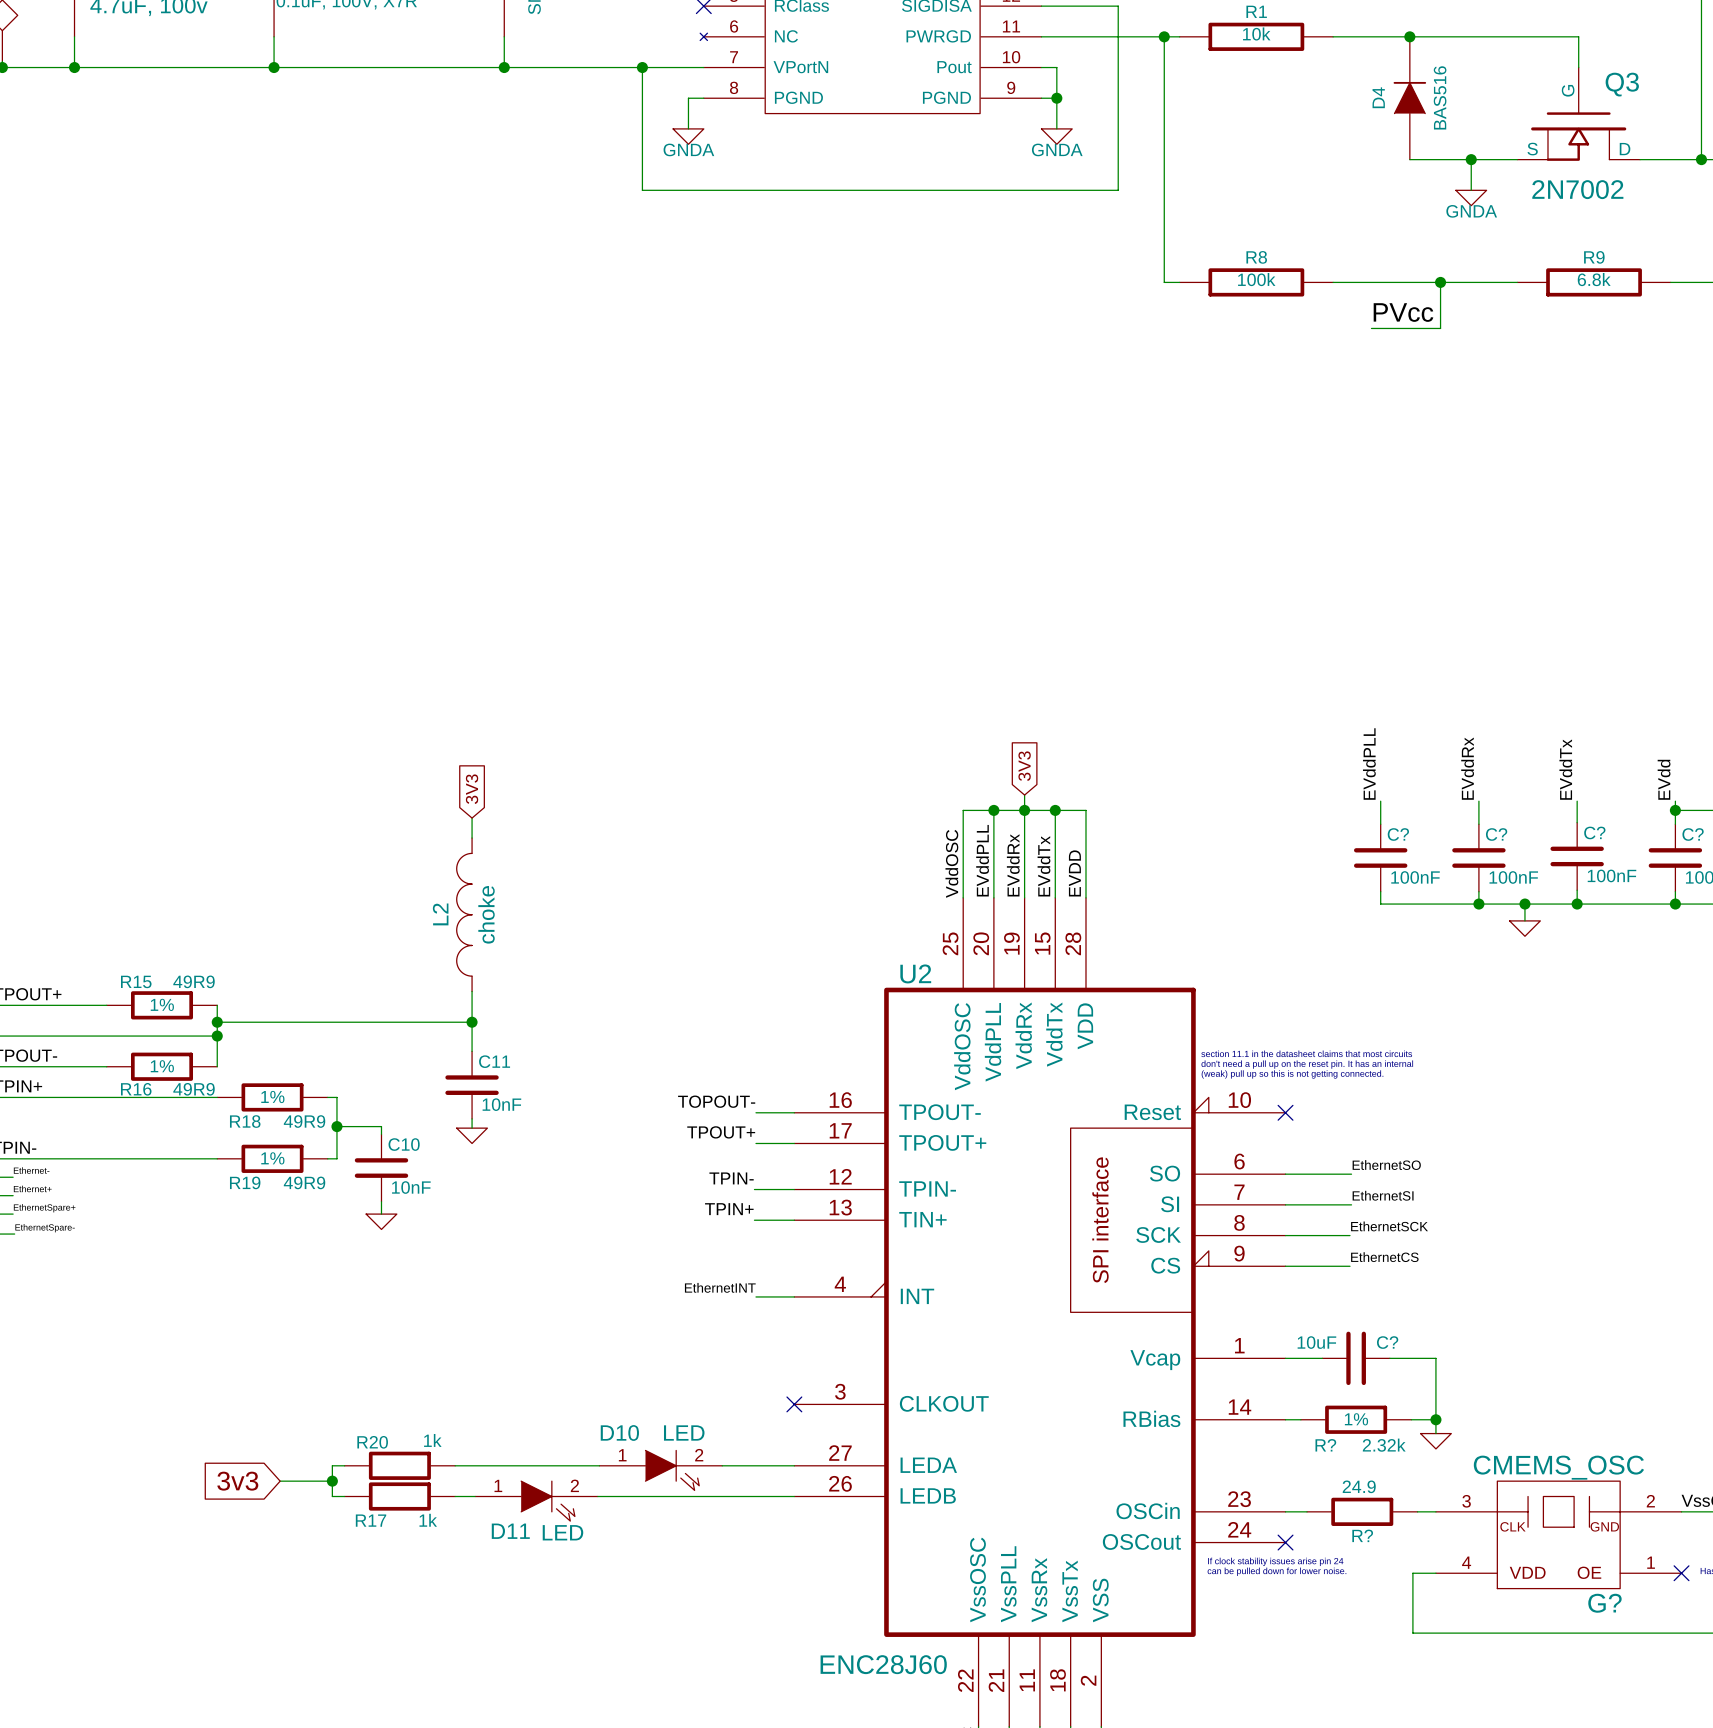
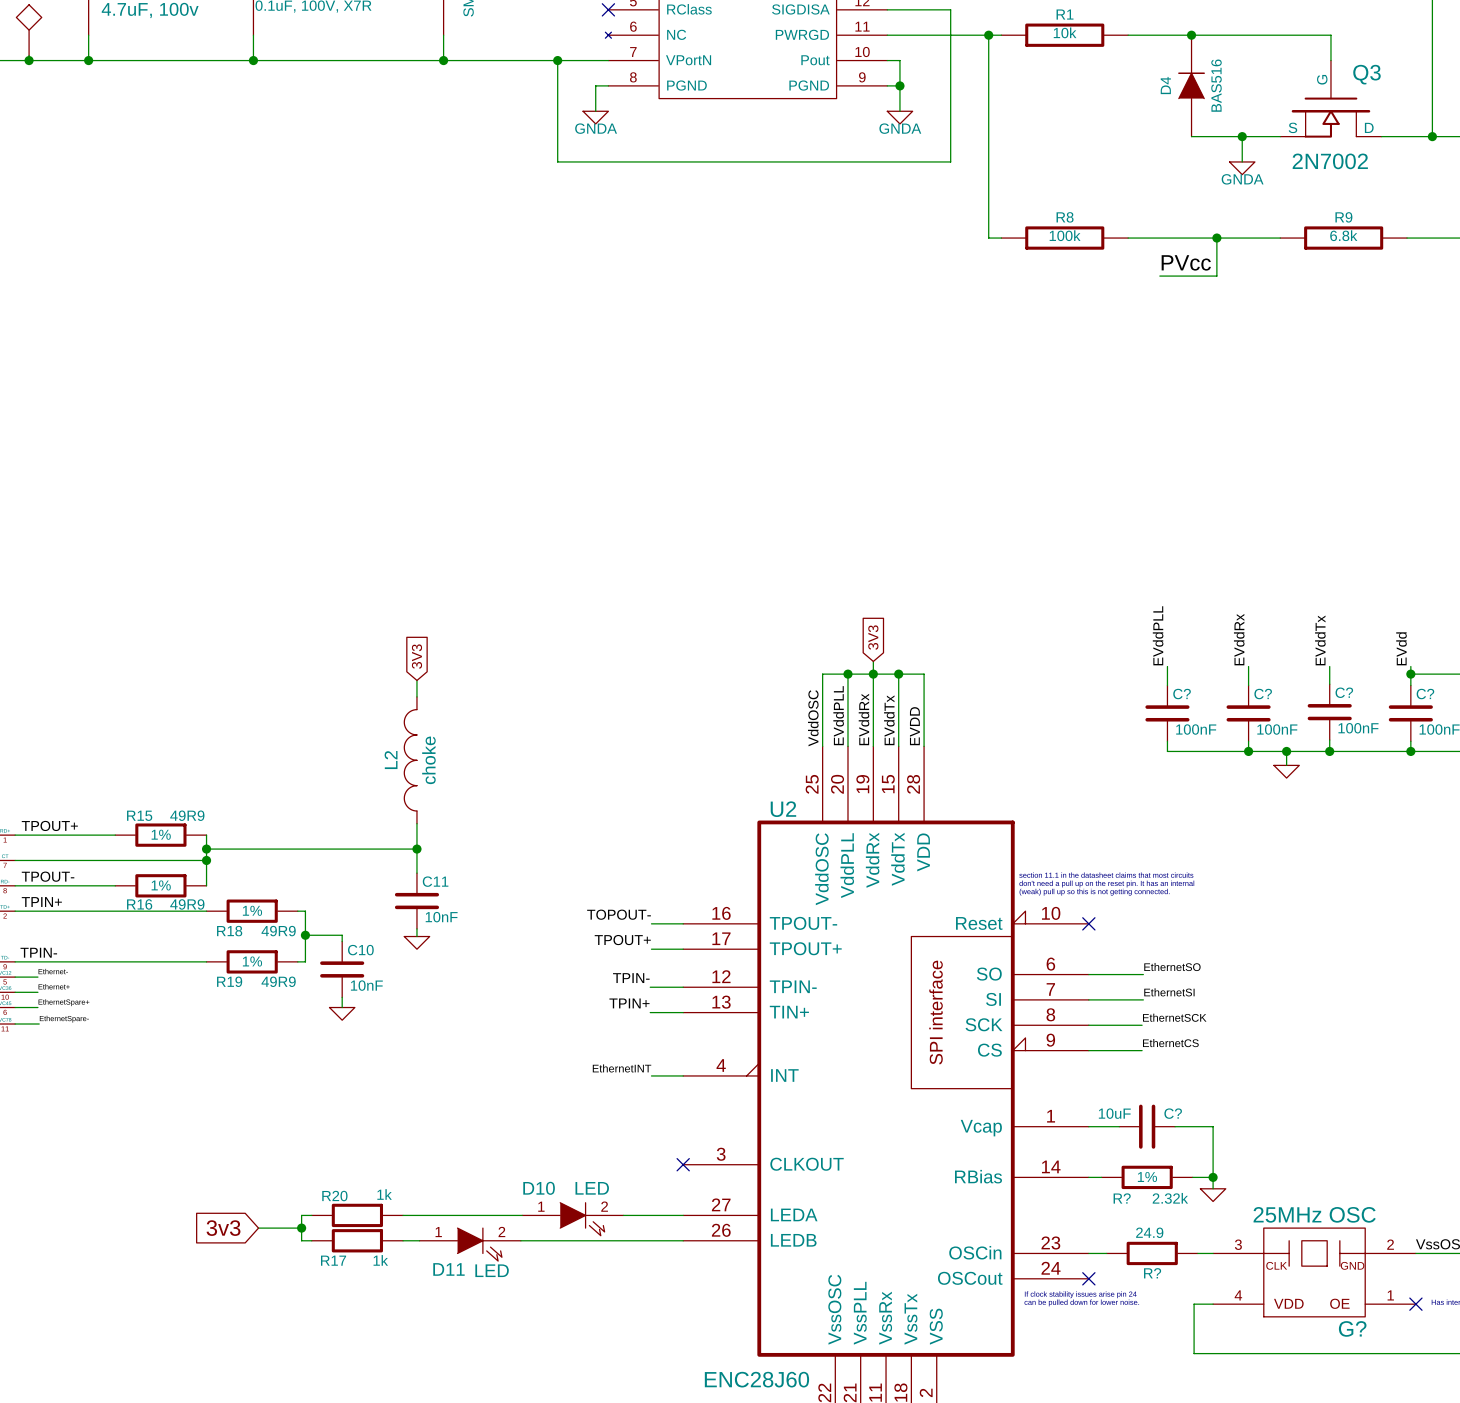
G? value: CMEMS_OSC (1558, 1467) -> 25MHz OSC (1314, 1214)

